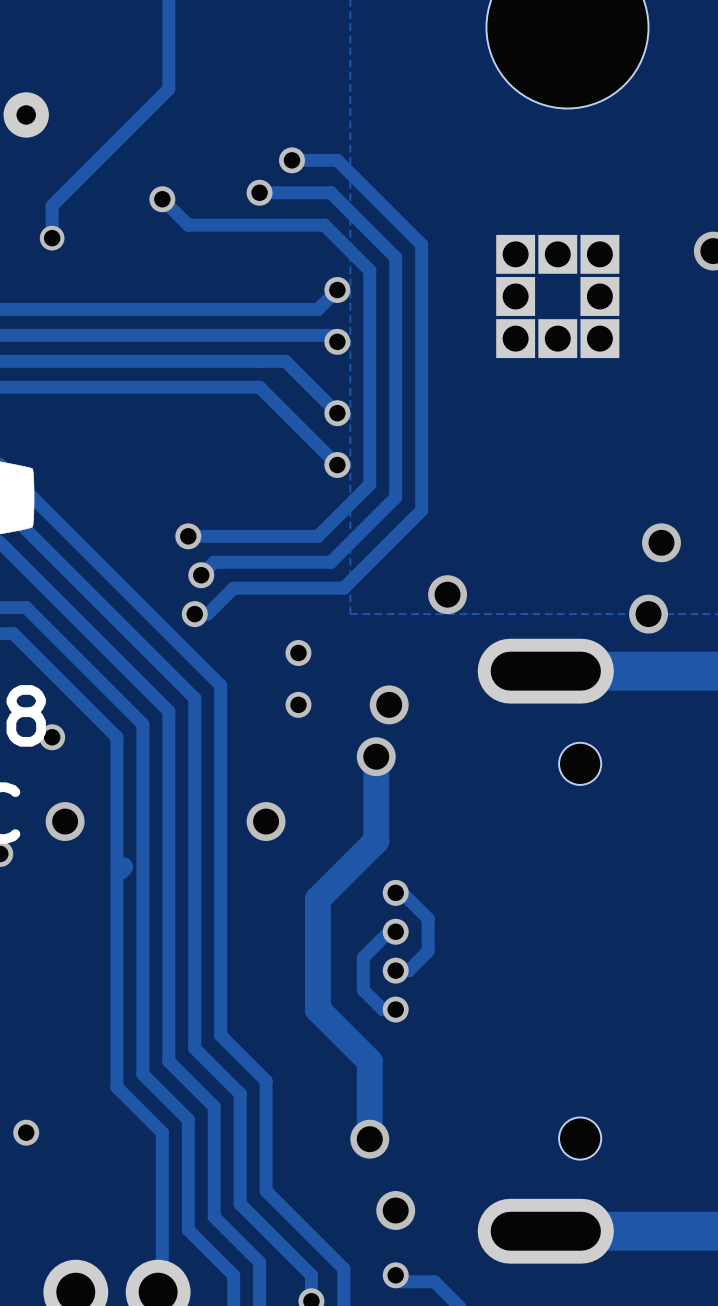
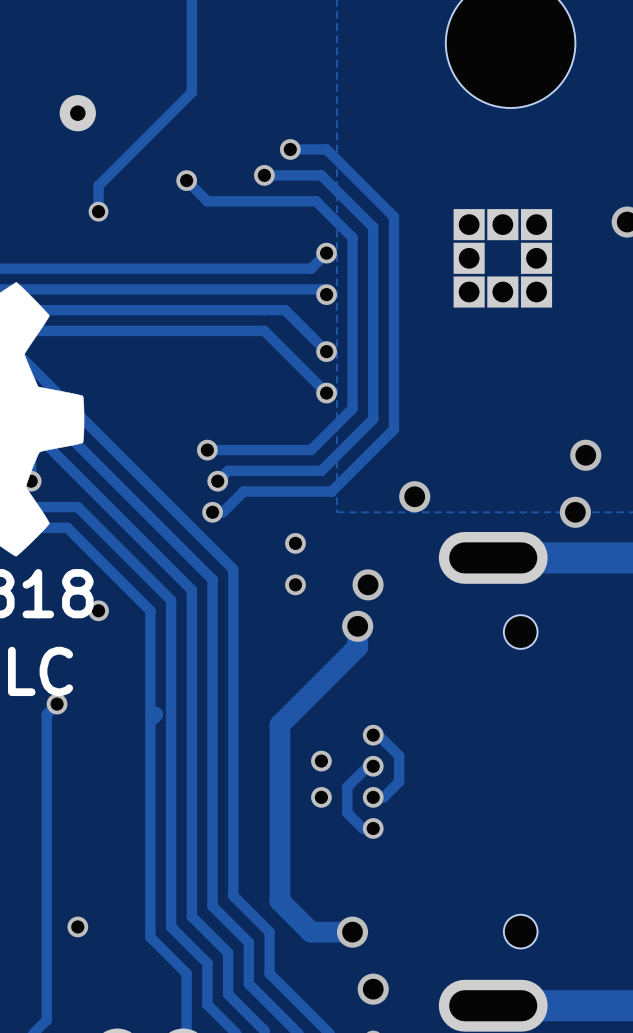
track: (376, 782) (376, 840) (317, 899) (317, 1009) (369, 1061) (369, 1139) -> (357, 647) (279, 724) (279, 901) (311, 932) (352, 932)
via: (65, 821) -> none
via: (266, 821) -> none
via: none -> (321, 761)
via: none -> (321, 797)
track: (220, 1035) (266, 1080) (266, 1139) -> (233, 849) (233, 895) (269, 932)
track: (194, 1048) (240, 1093) (240, 1152) -> (212, 859) (212, 906) (248, 942)
track: (168, 1061) (214, 1106) (214, 1165) -> (191, 869) (191, 916) (228, 952)
track: (142, 1074) (188, 1119) (188, 1178) -> (171, 880) (171, 926) (207, 963)
track: (116, 1087) (162, 1132) (162, 1191) -> (150, 890) (150, 937) (186, 973)

